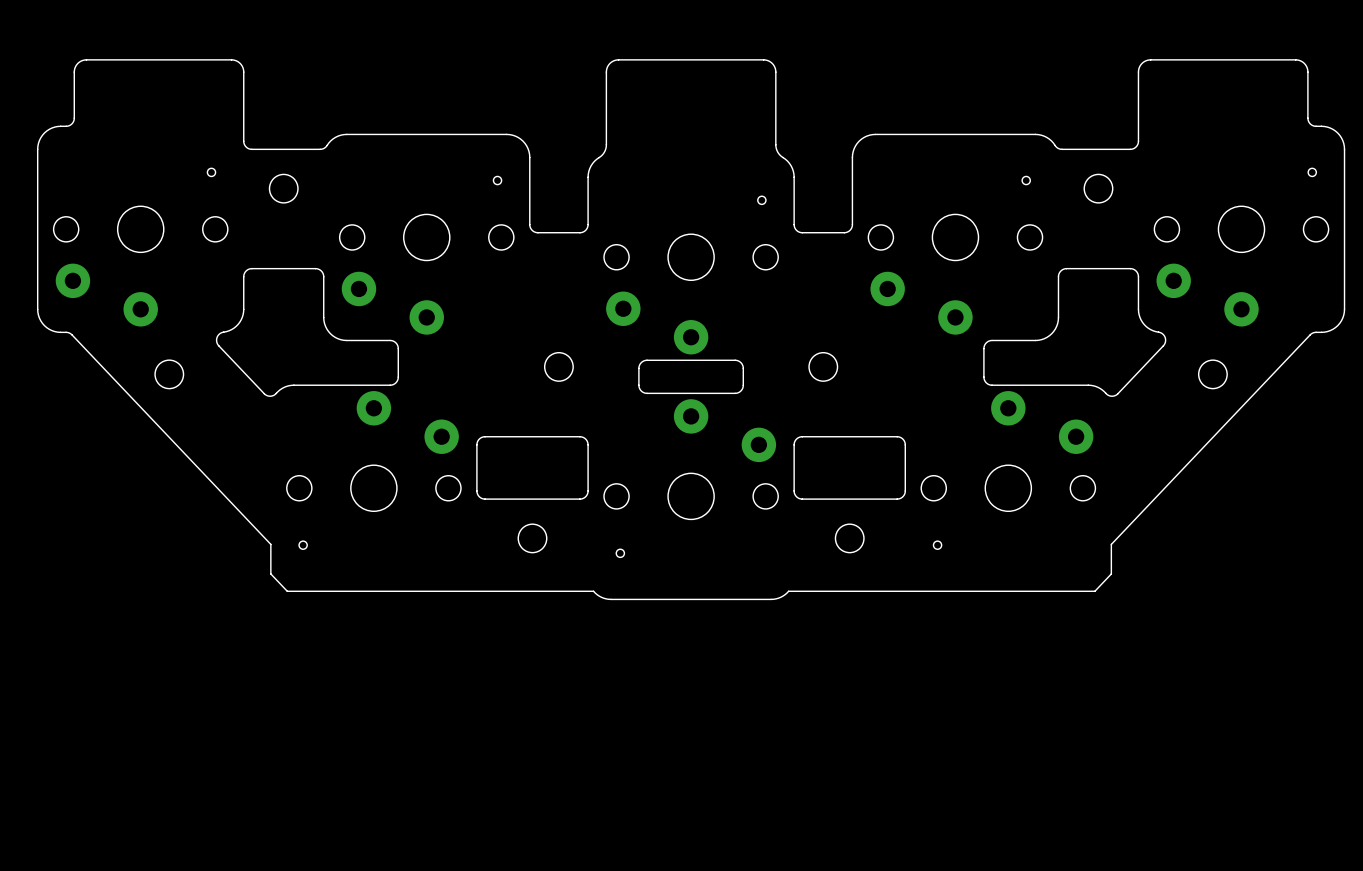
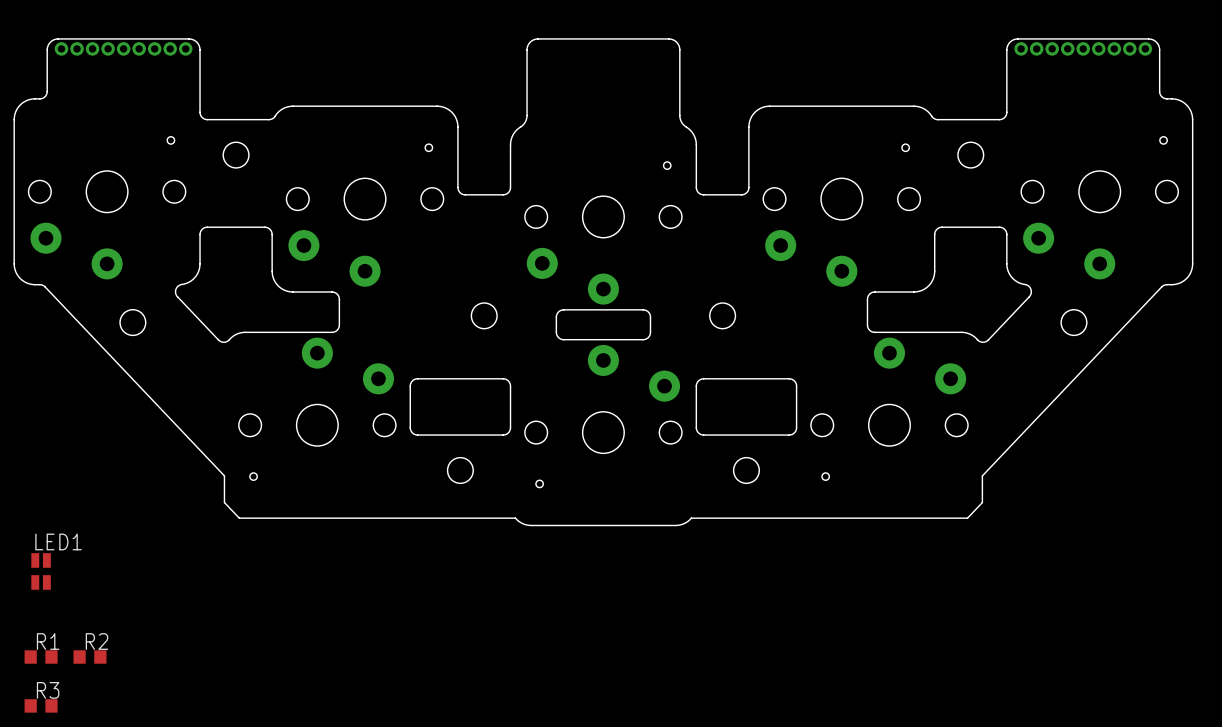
part: none -> (123, 48)
part: none -> (1083, 48)
LED1: none -> (41, 571)
R1: none -> (41, 657)
R2: none -> (89, 657)
R3: none -> (41, 705)

